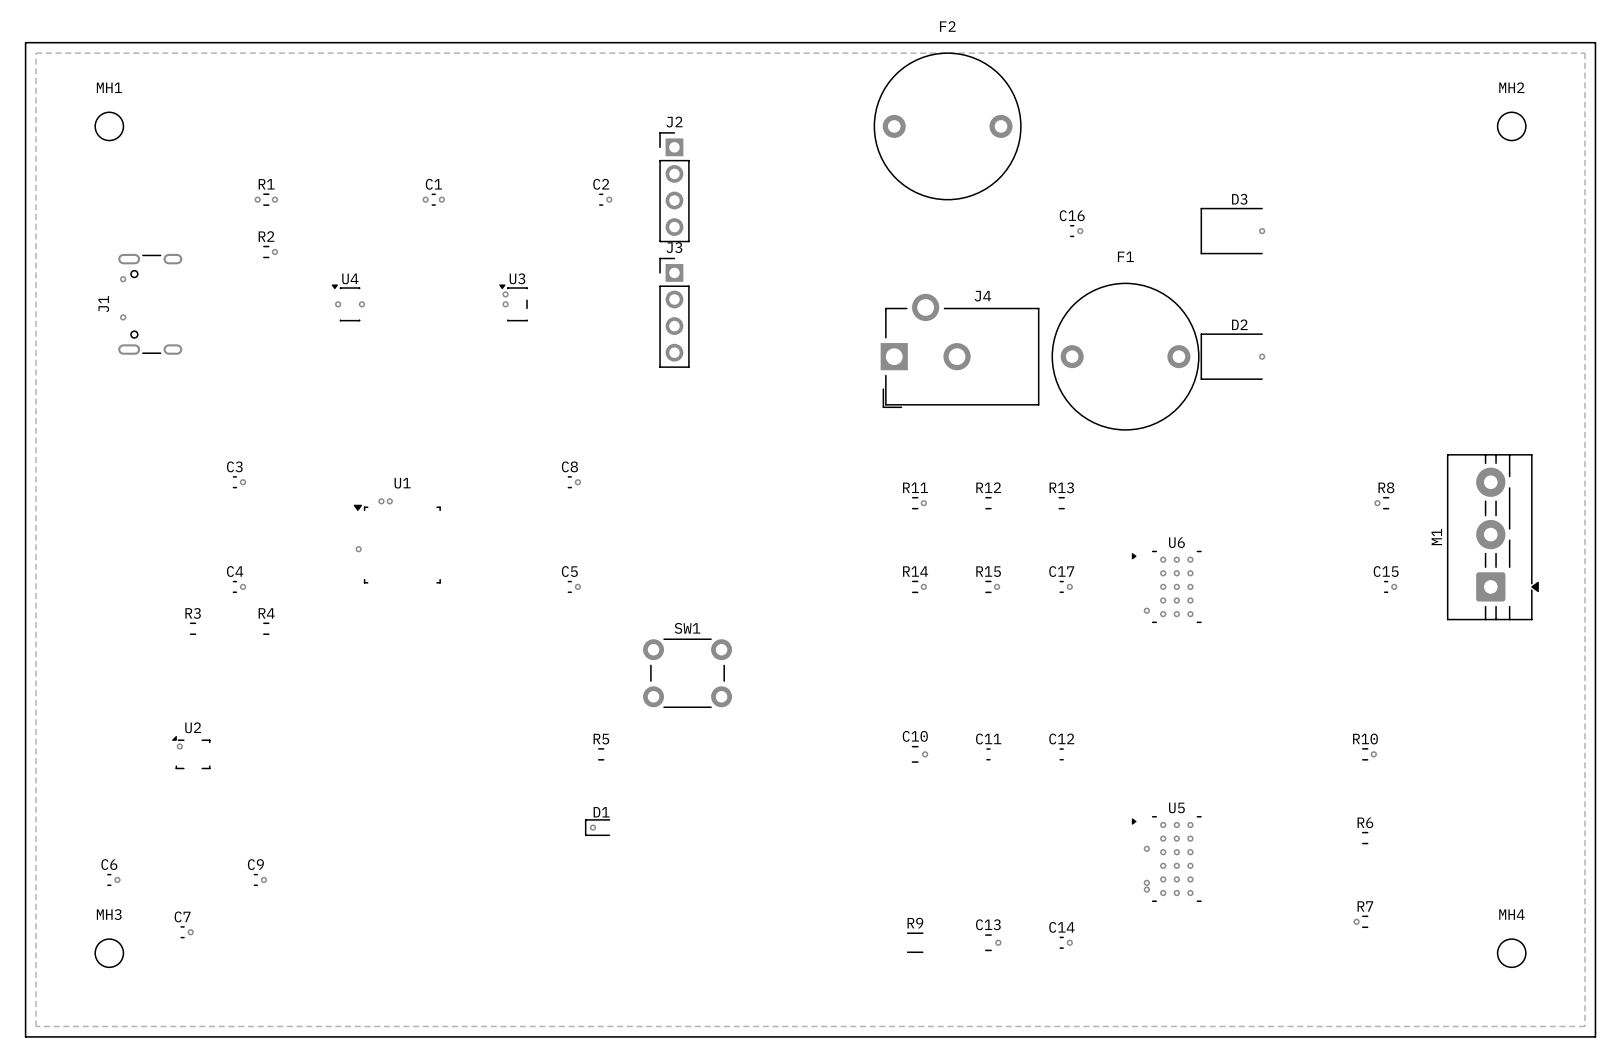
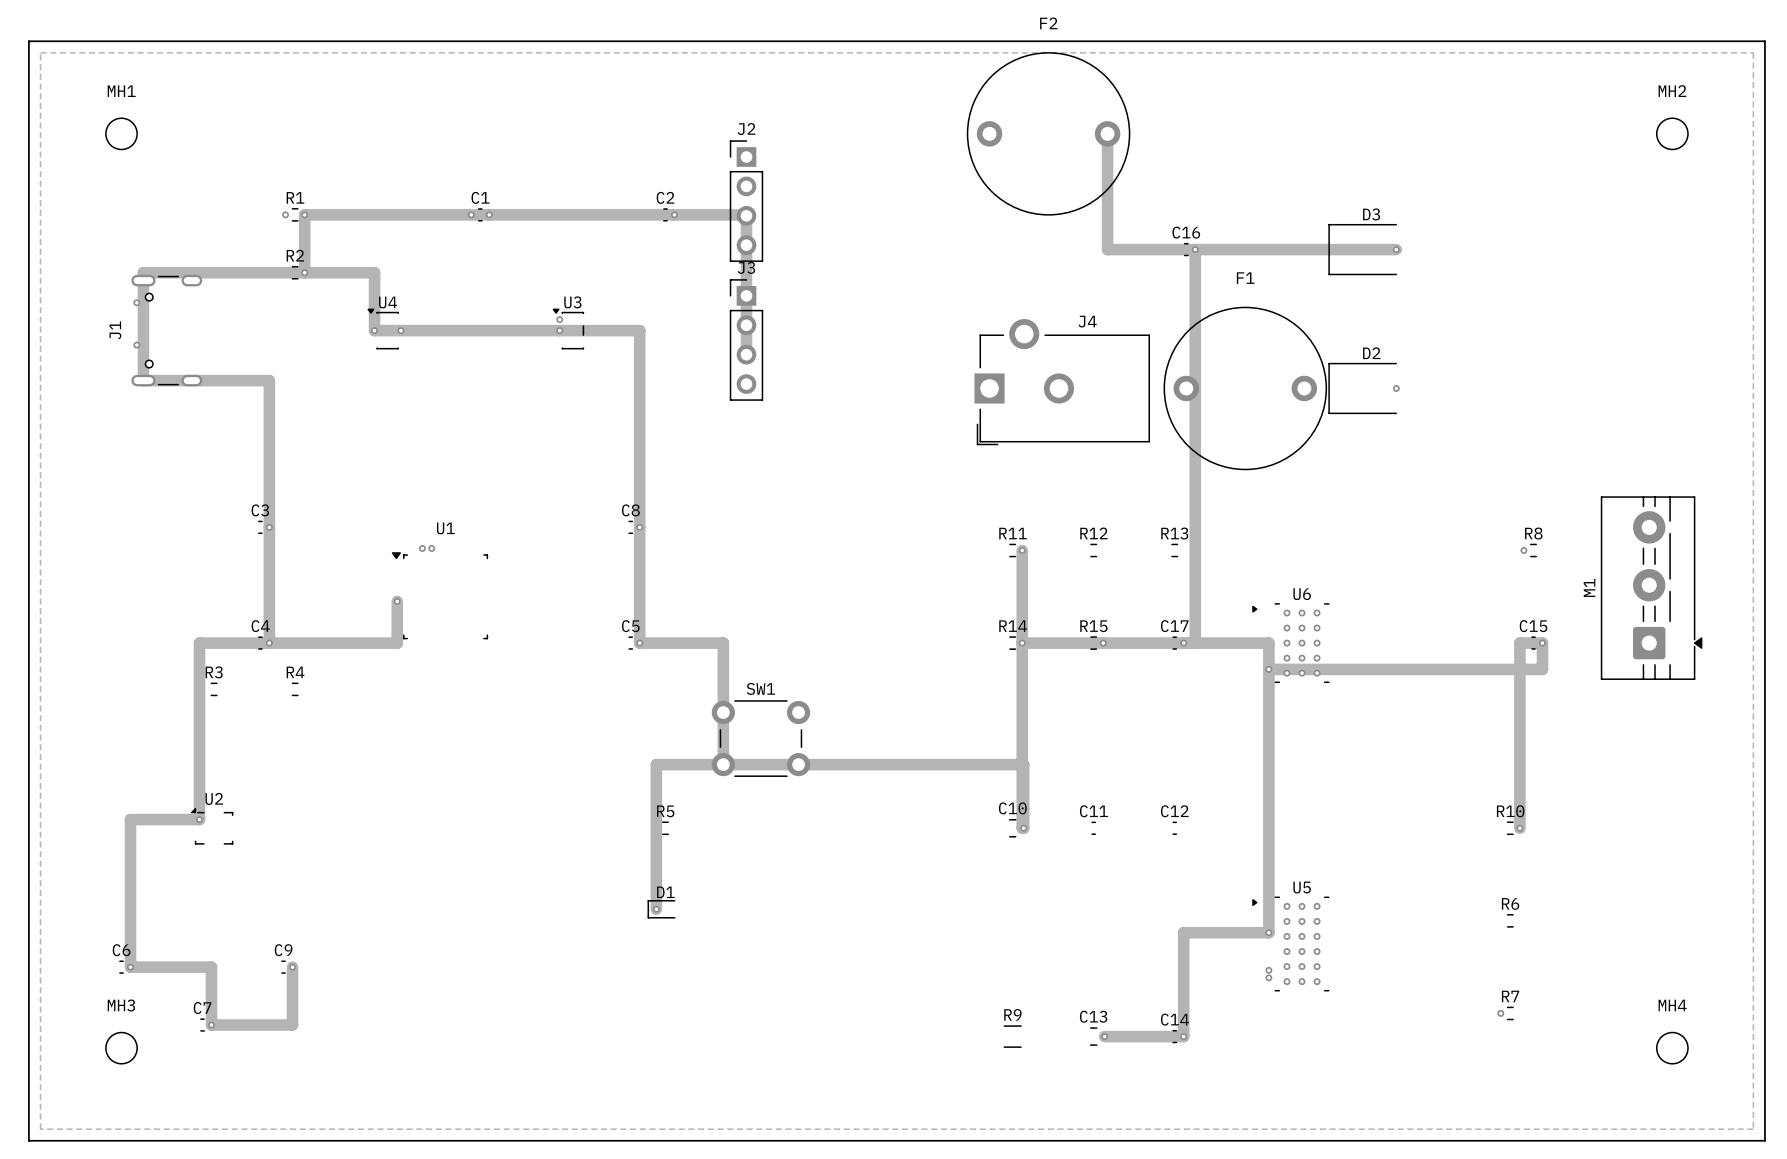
track: none -> (1107, 133) (1107, 249) (1396, 249)
track: none -> (1195, 249) (1195, 643)
track: none -> (304, 272) (304, 214) (746, 214) (746, 354)
track: none -> (1022, 550) (1022, 828) (1023, 828) (1023, 764) (656, 764) (656, 909)
track: none -> (397, 601) (397, 643) (199, 643) (199, 819) (130, 819) (130, 967) (211, 967) (211, 1025) (292, 1025) (292, 967)
track: none -> (269, 643) (269, 380) (143, 380) (143, 272) (374, 272) (374, 330) (639, 330) (639, 643) (723, 643) (723, 764)
track: none -> (1022, 643) (1268, 643) (1268, 932) (1183, 932) (1183, 1036) (1104, 1036)
track: none -> (1268, 669) (1542, 669) (1542, 643) (1519, 643) (1519, 828)

